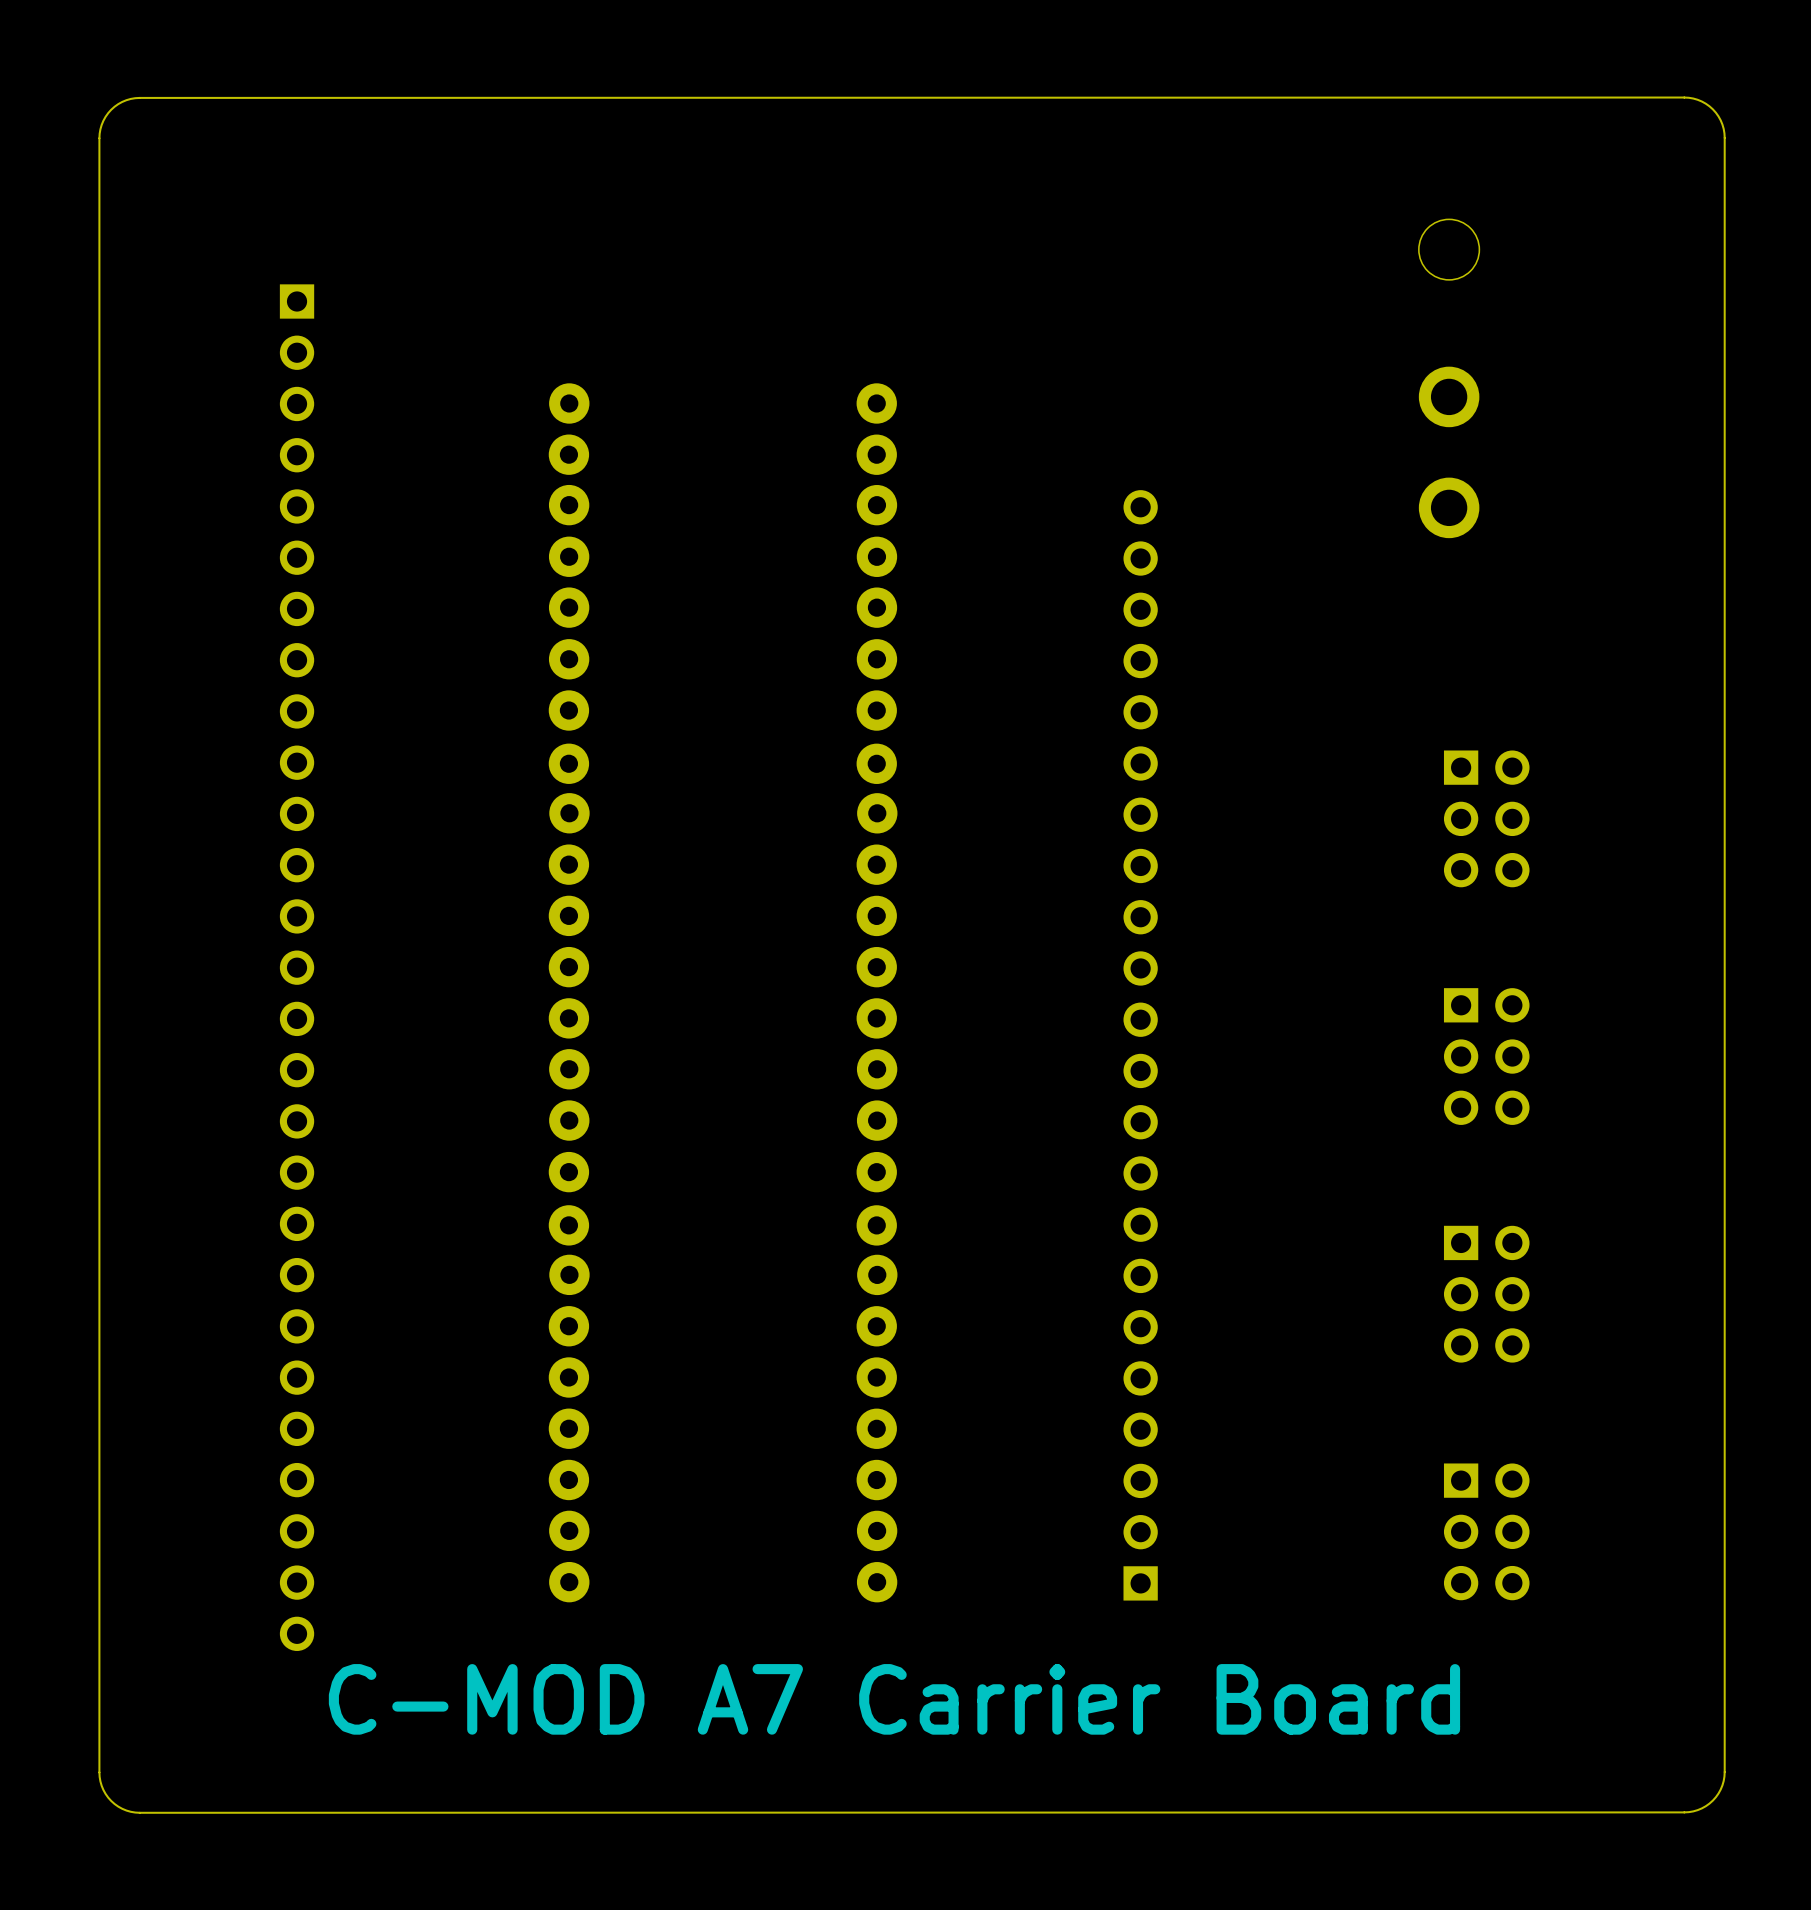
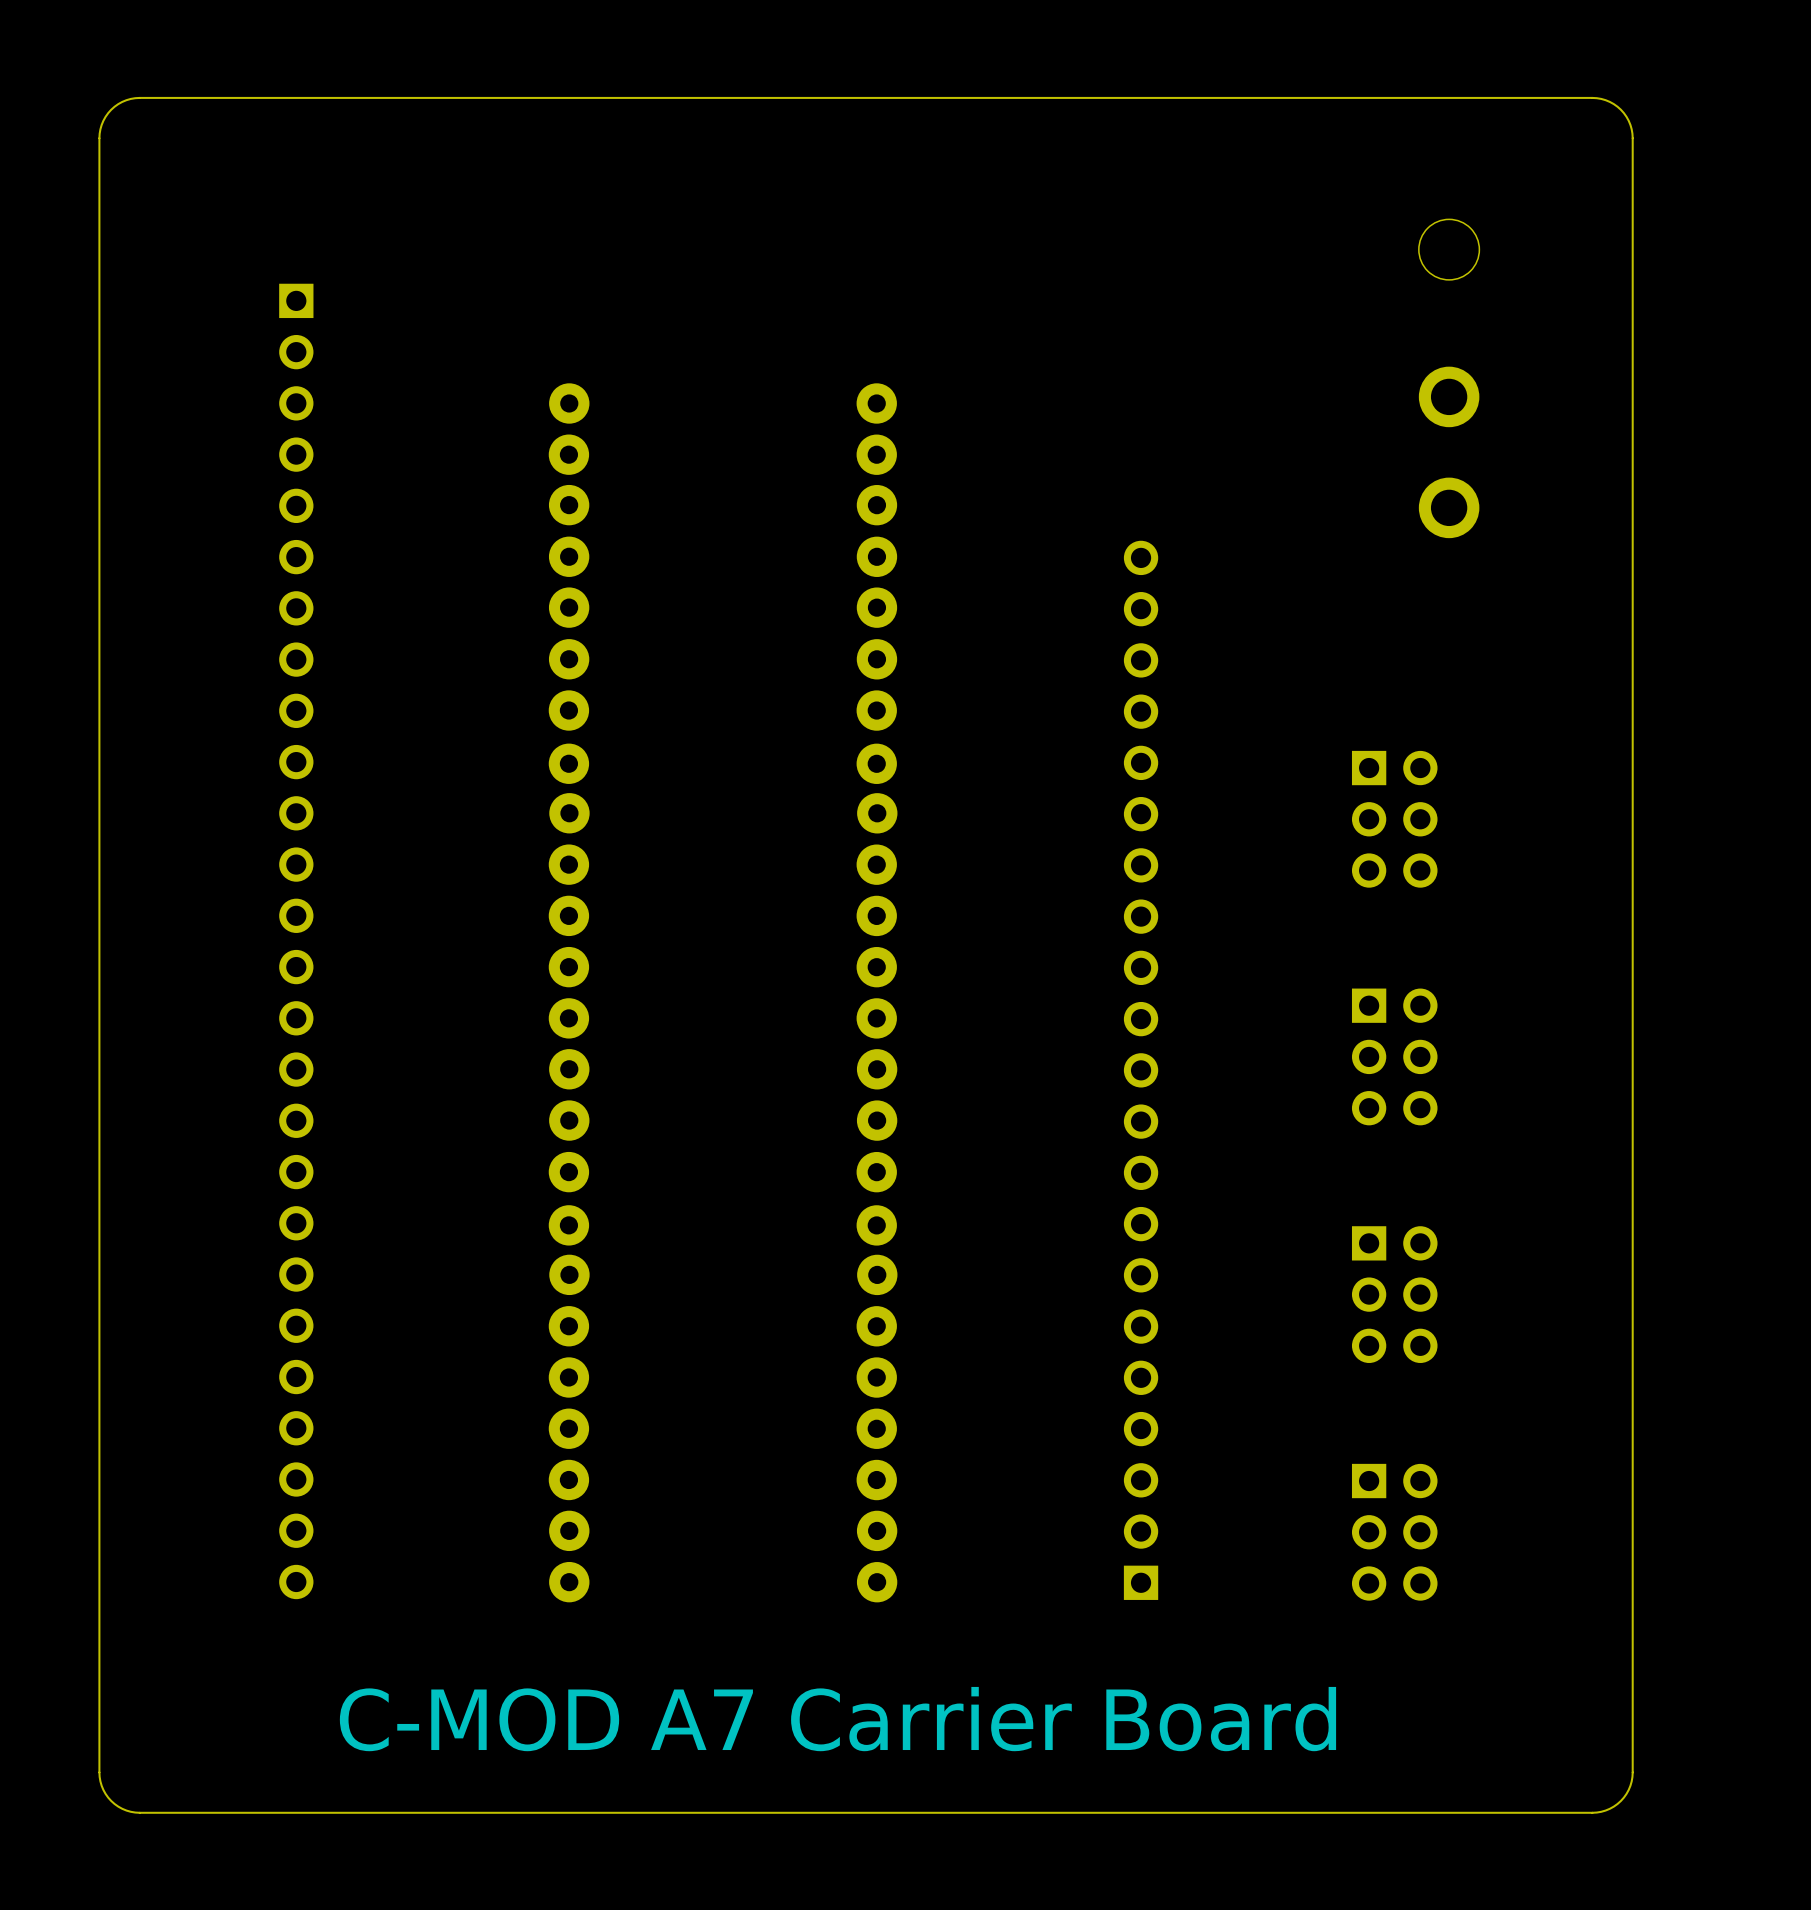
board edge: (99, 138) (101, 124) (111, 109) (126, 100) (139, 97) (1684, 97) (1697, 99) (1712, 109) (1722, 124) (1724, 137) (1724, 1772) (1722, 1785) (1712, 1800) (1697, 1810) (1684, 1812) (139, 1812) (126, 1810) (111, 1800) (101, 1785) (99, 1772) -> (99, 138) (103, 120) (111, 109) (126, 100) (139, 97) (1592, 97) (1605, 100) (1620, 109) (1628, 120) (1632, 138) (1632, 1772) (1630, 1785) (1620, 1800) (1609, 1808) (1592, 1812) (139, 1812) (126, 1810) (111, 1800) (103, 1789) (99, 1772)
part position: (1486, 818) -> (1394, 819)
part: none -> (296, 941)
part: (297, 967) -> none
part: (1140, 1045) -> none
part position: (1486, 1056) -> (1394, 1056)
part: none -> (1141, 1070)
part position: (1486, 1294) -> (1394, 1294)
part position: (1486, 1531) -> (1394, 1532)
text position: C-MOD A7 Carrier Board (894, 1699) -> C-MOD A7 Carrier Board (837, 1719)

